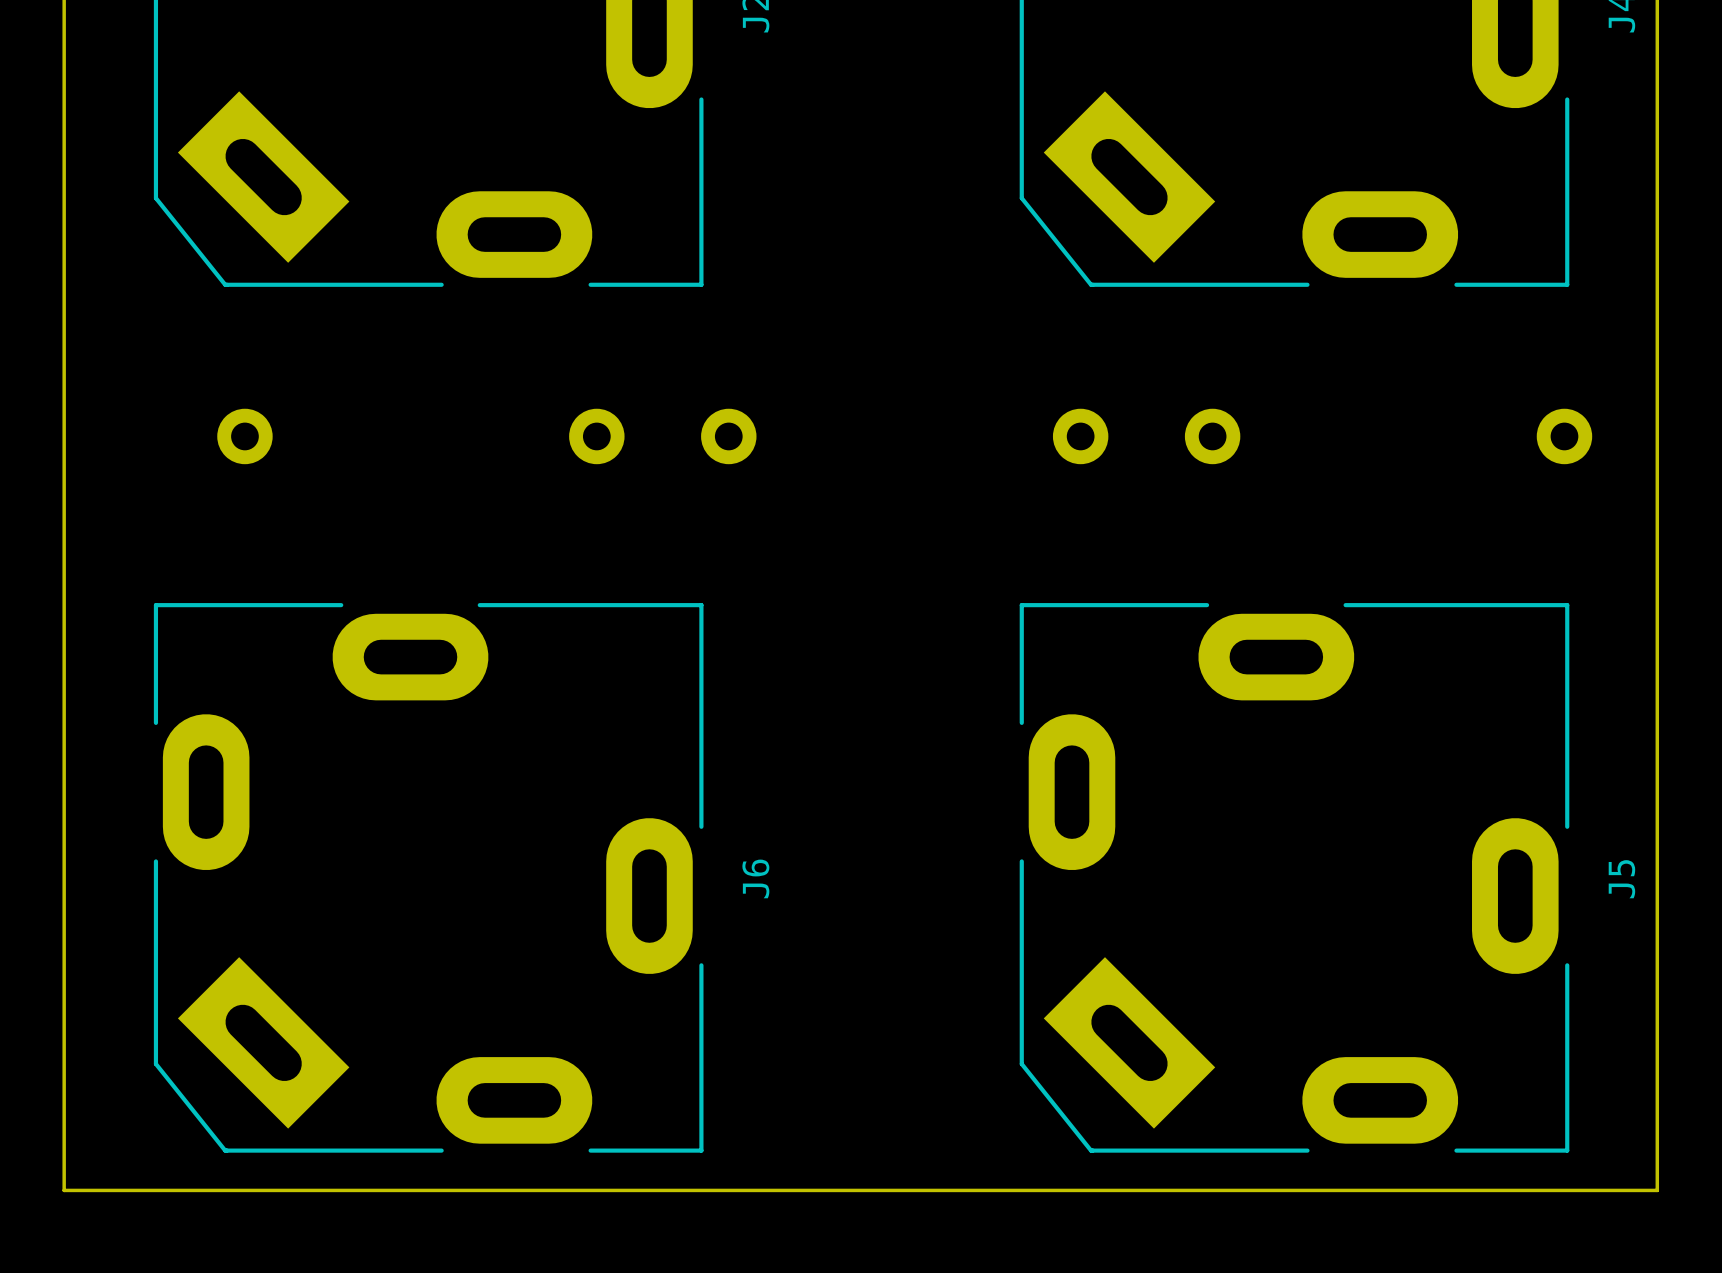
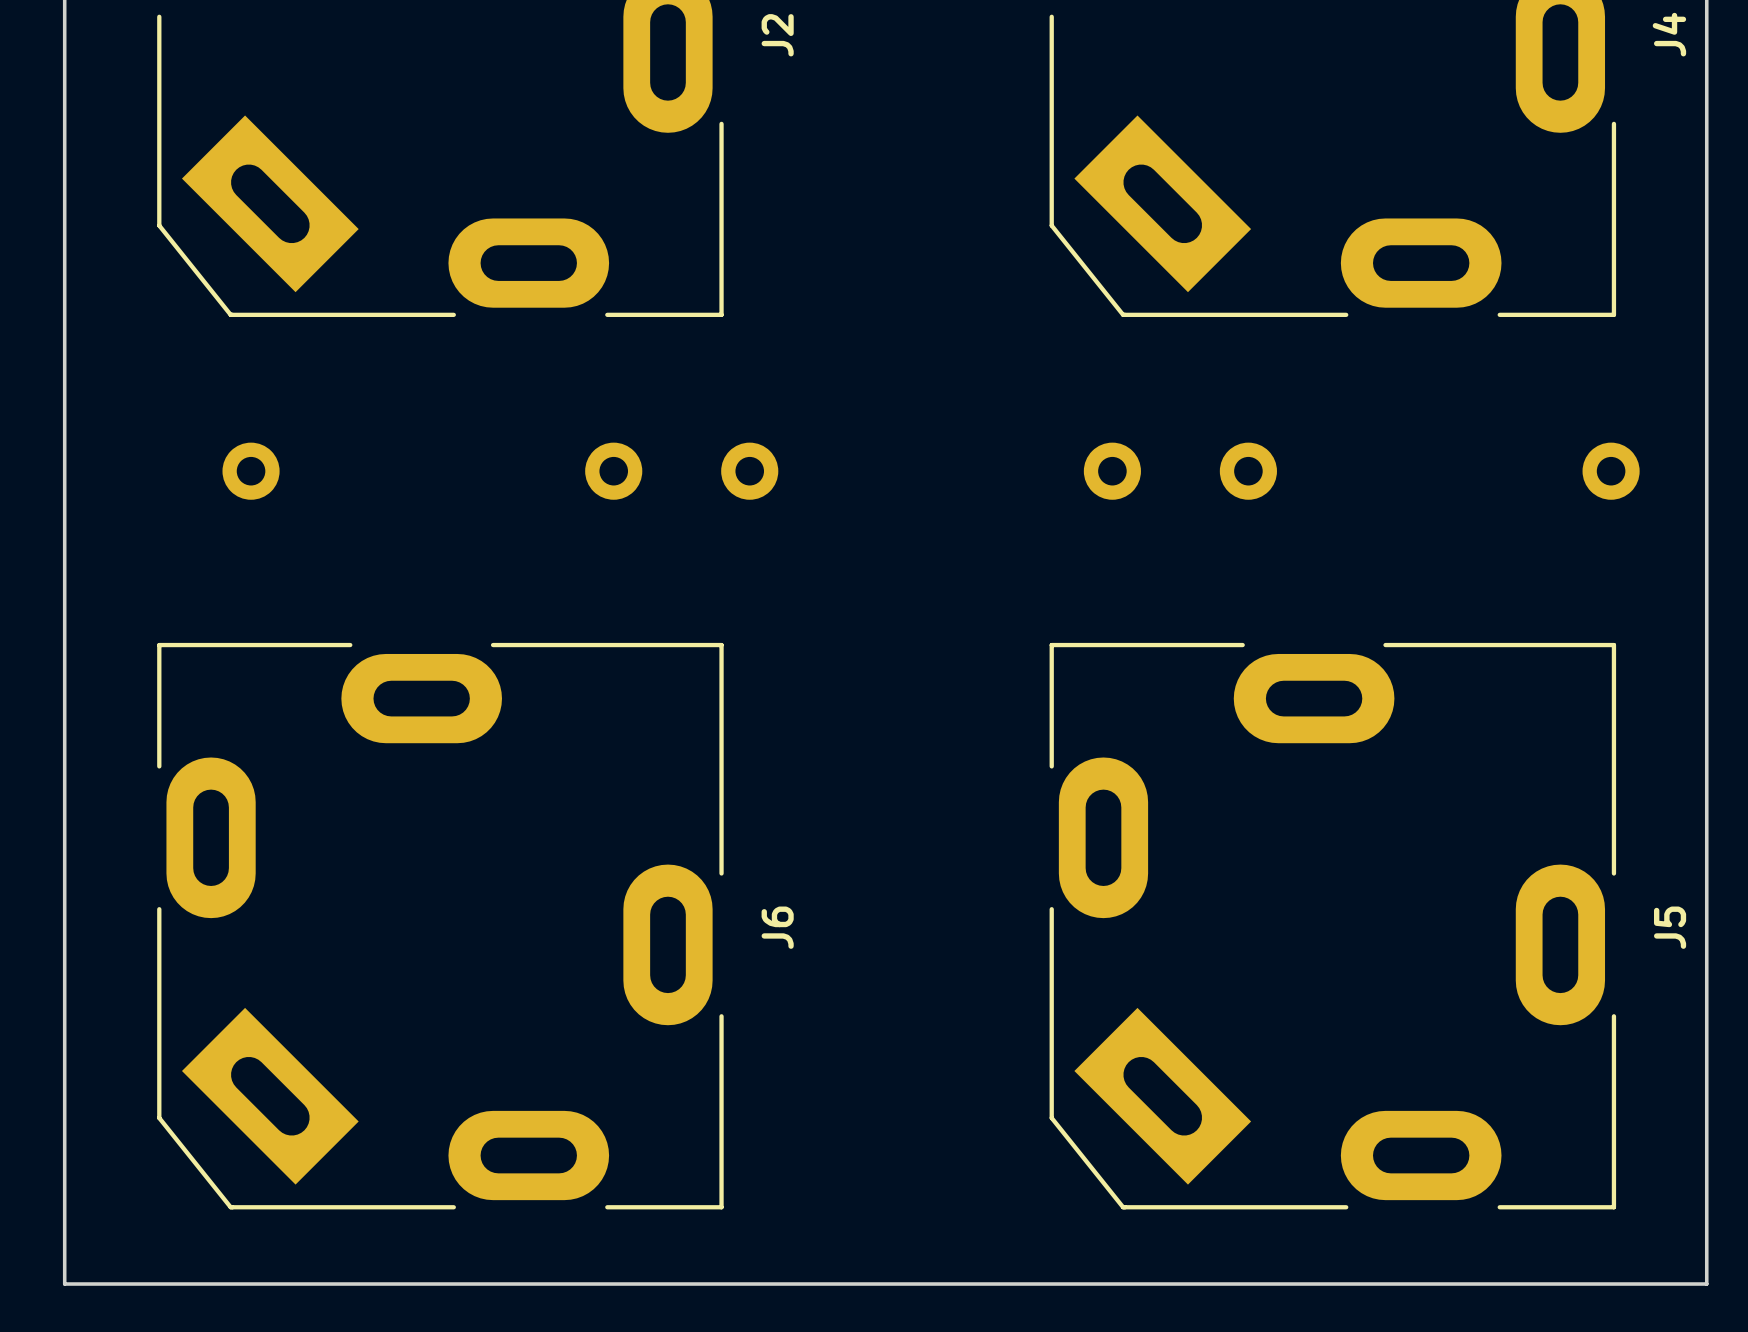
board edge: (64, 1190) (1657, 1190) -> (64, 1248) (64, 1284) (1706, 1284) (1706, 1248)

